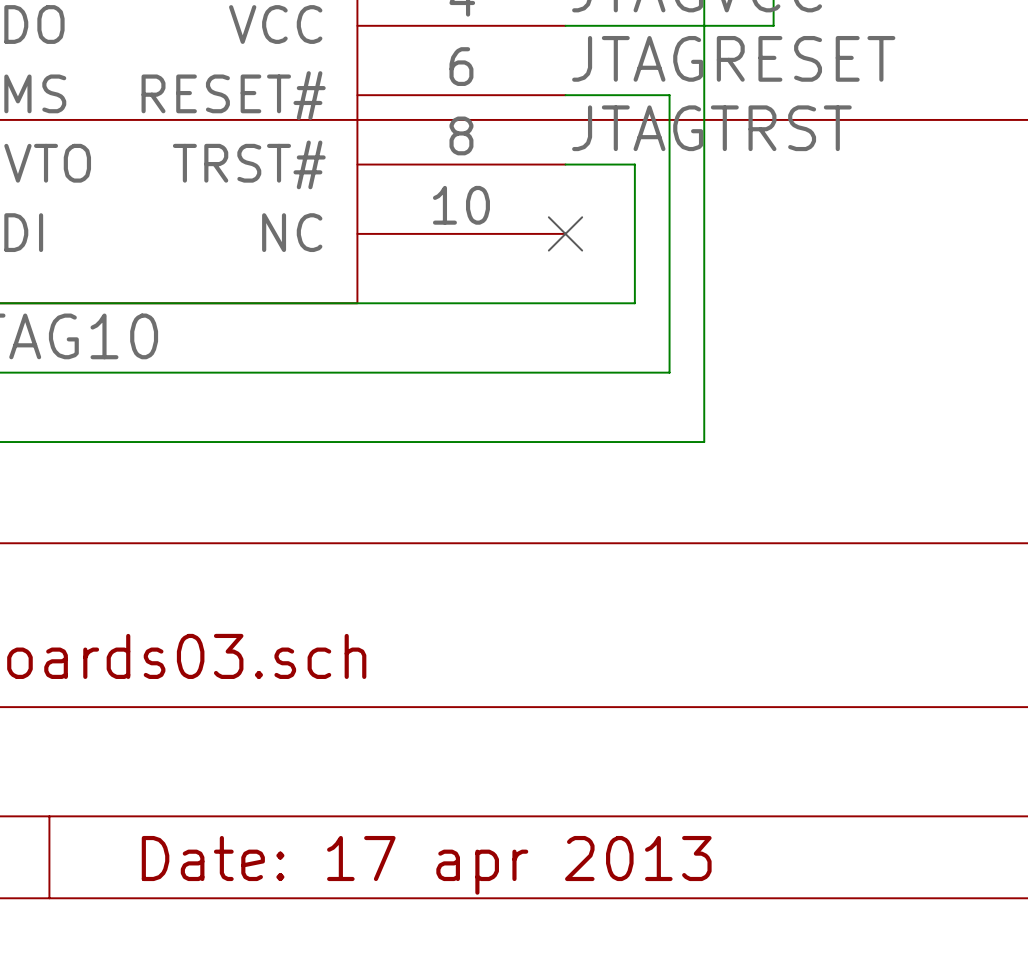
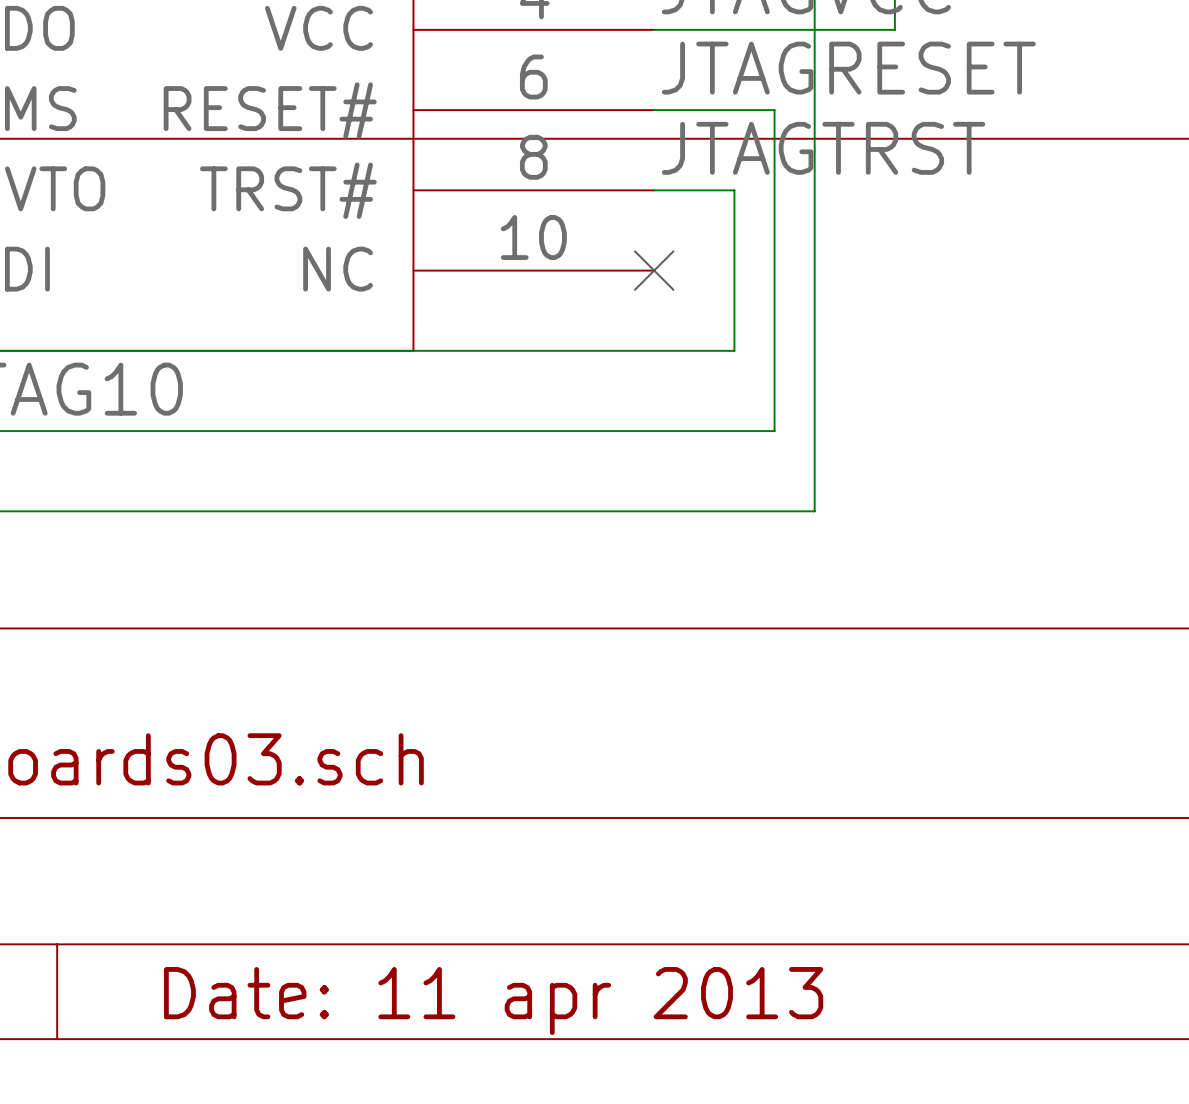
title block: Date: 17 apr 2013 (426, 865) -> Date: 11 apr 2013 (493, 1001)

